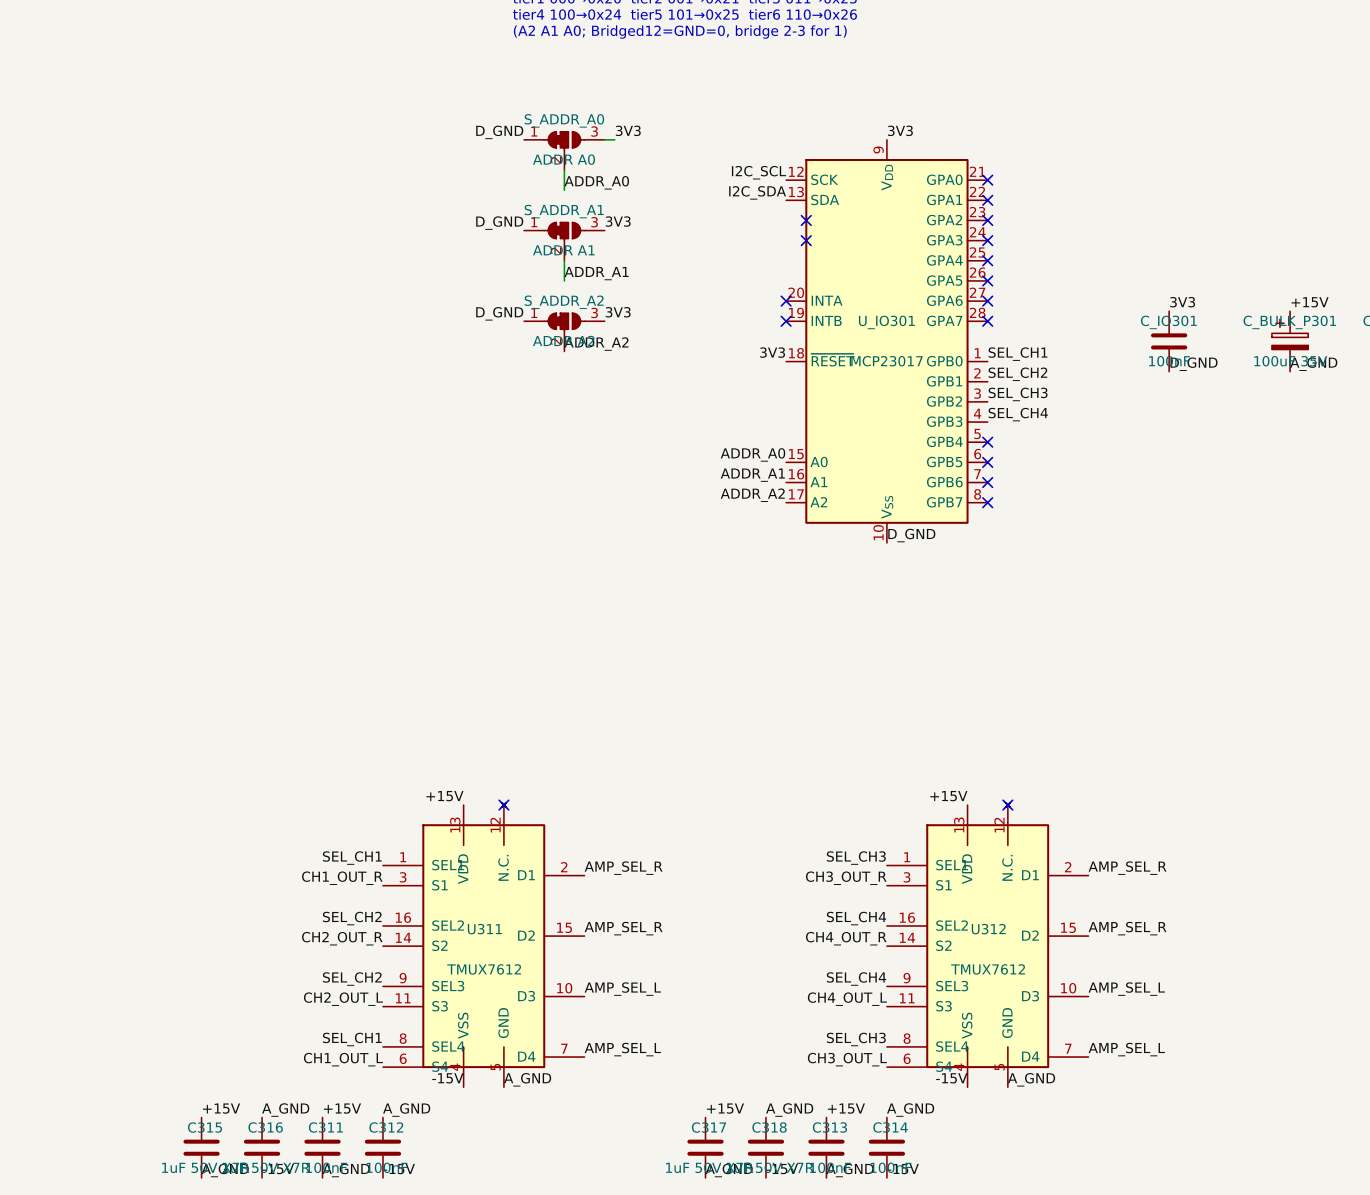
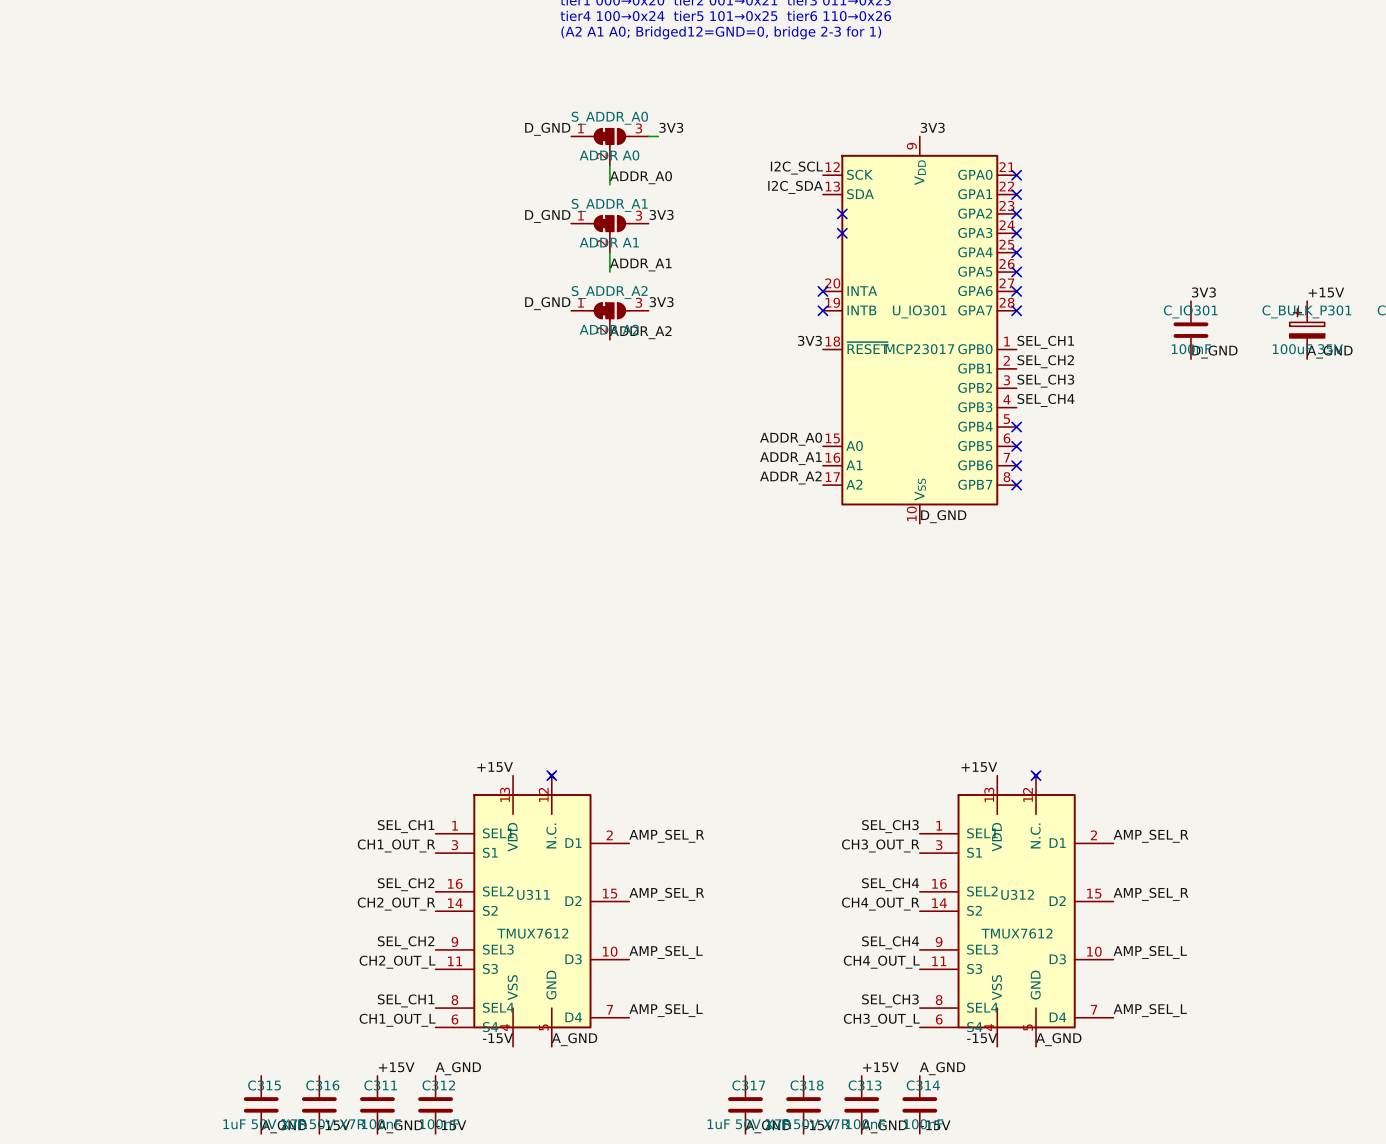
label: +15V (221, 1108) -> none
label: +15V (725, 1108) -> none
label: A_GND (285, 1110) -> none
label: A_GND (789, 1110) -> none

